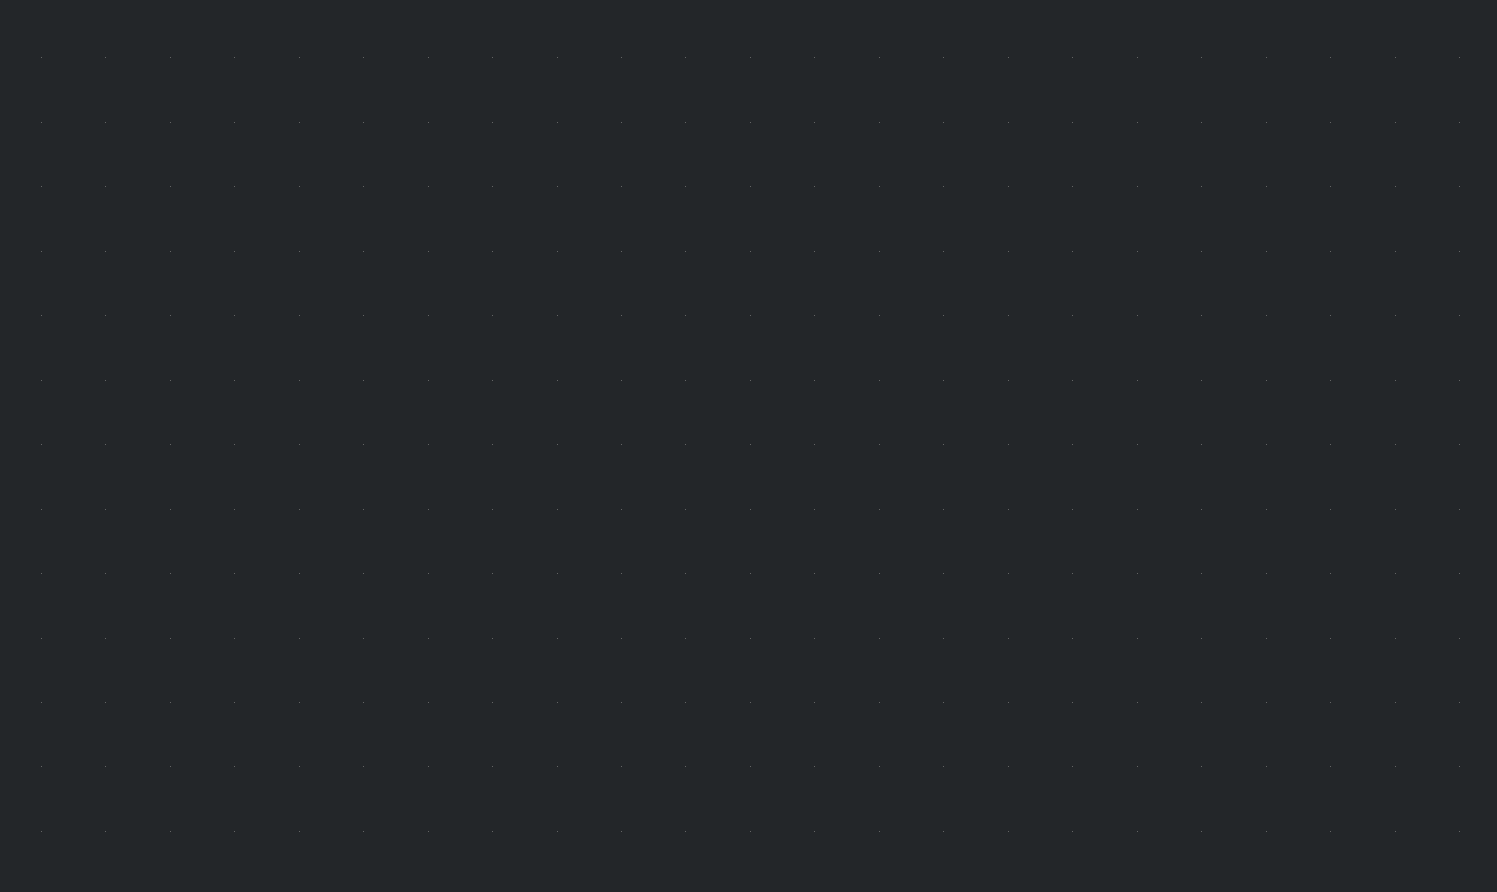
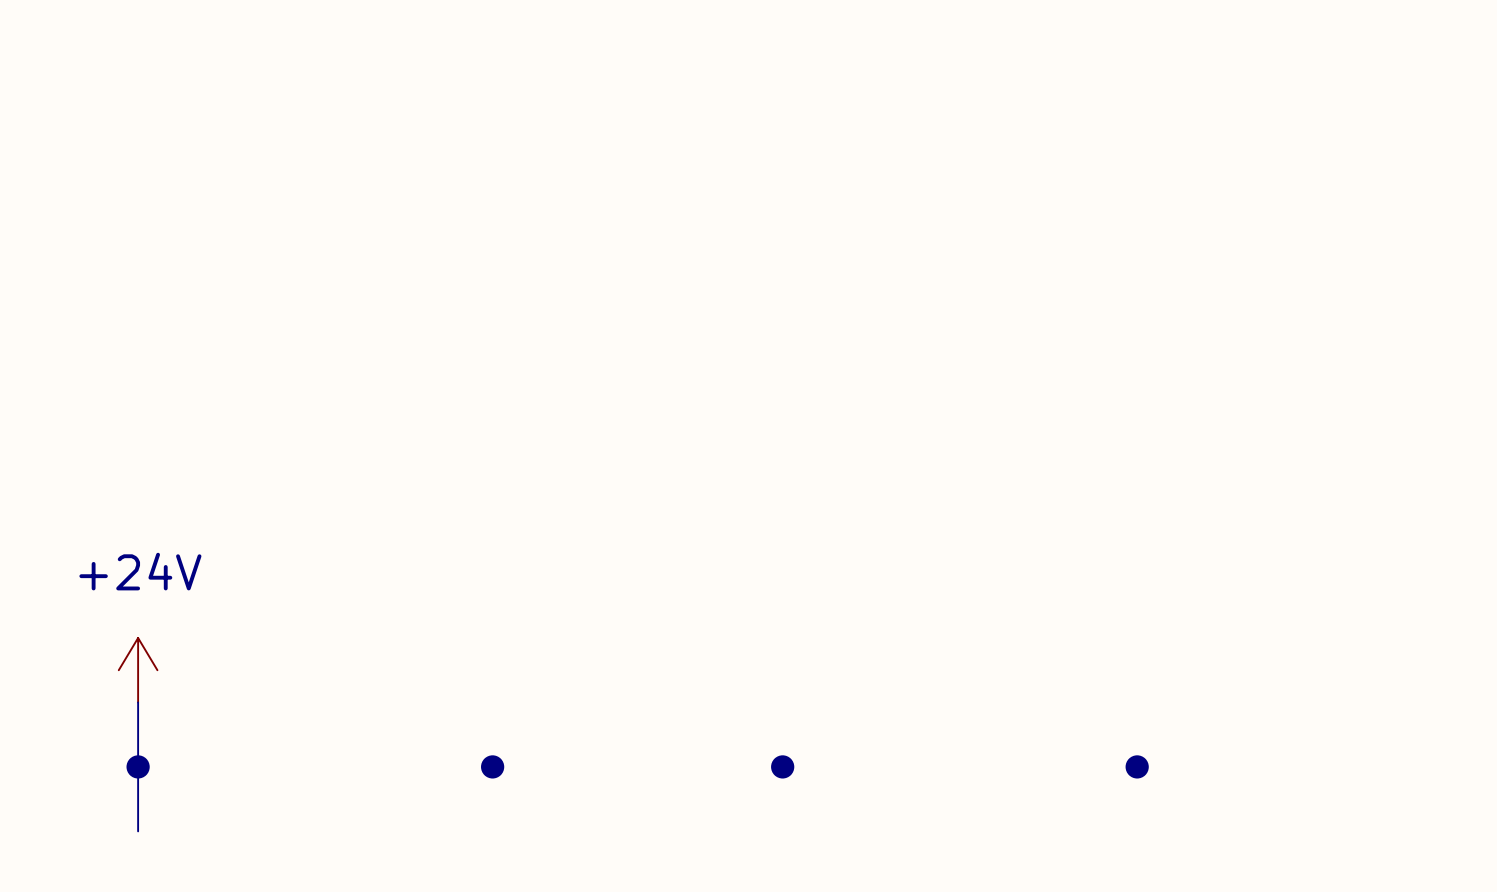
power symbol: none -> +24V (138, 670)
wire: none -> (138, 702) (138, 831)
junction: none -> (138, 766)
junction: none -> (492, 766)
junction: none -> (782, 766)
junction: none -> (1137, 766)

